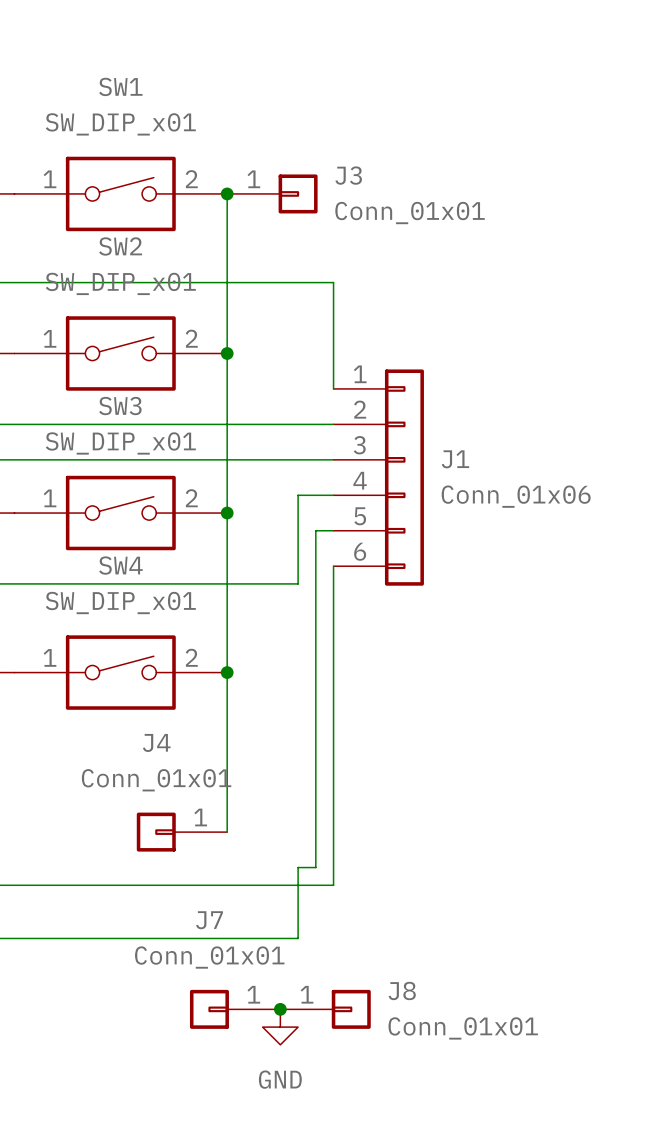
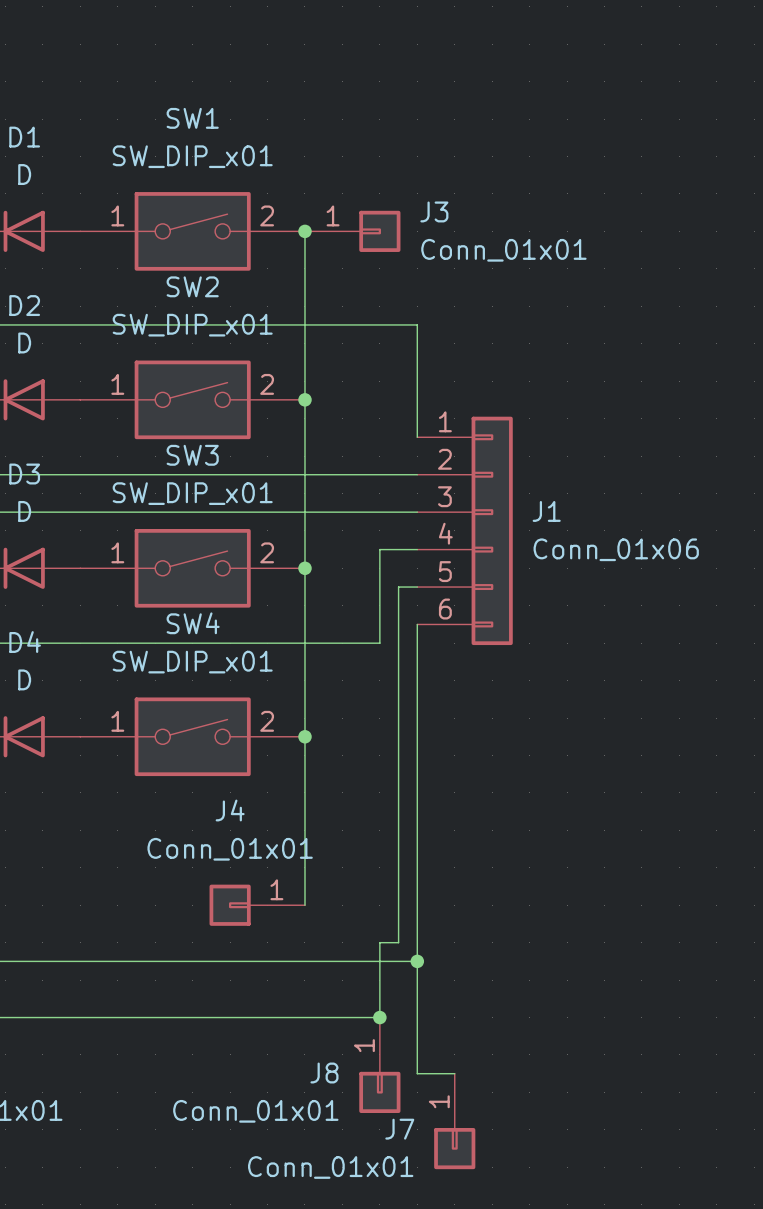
wire: none -> (417, 961) (417, 1073) (454, 1073)
junction: none -> (417, 961)
J7 name position: J7 (209, 920) -> J7 (399, 1129)
junction: none -> (379, 1017)
J7 value position: Conn_01x01 (209, 957) -> Conn_01x01 (330, 1167)
J8 name position: J8 (402, 990) -> J8 (324, 1073)
J7 rotation: 0° (209, 1009) -> 90° counterclockwise (454, 1148)
J7 position: (235, 1009) -> (454, 1121)
junction: (280, 1009) -> none
J8 rotation: 0° (351, 1009) -> 90° clockwise (379, 1092)
power symbol: GND (280, 1027) -> none
J8 value position: Conn_01x01 (463, 1028) -> Conn_01x01 (255, 1111)

